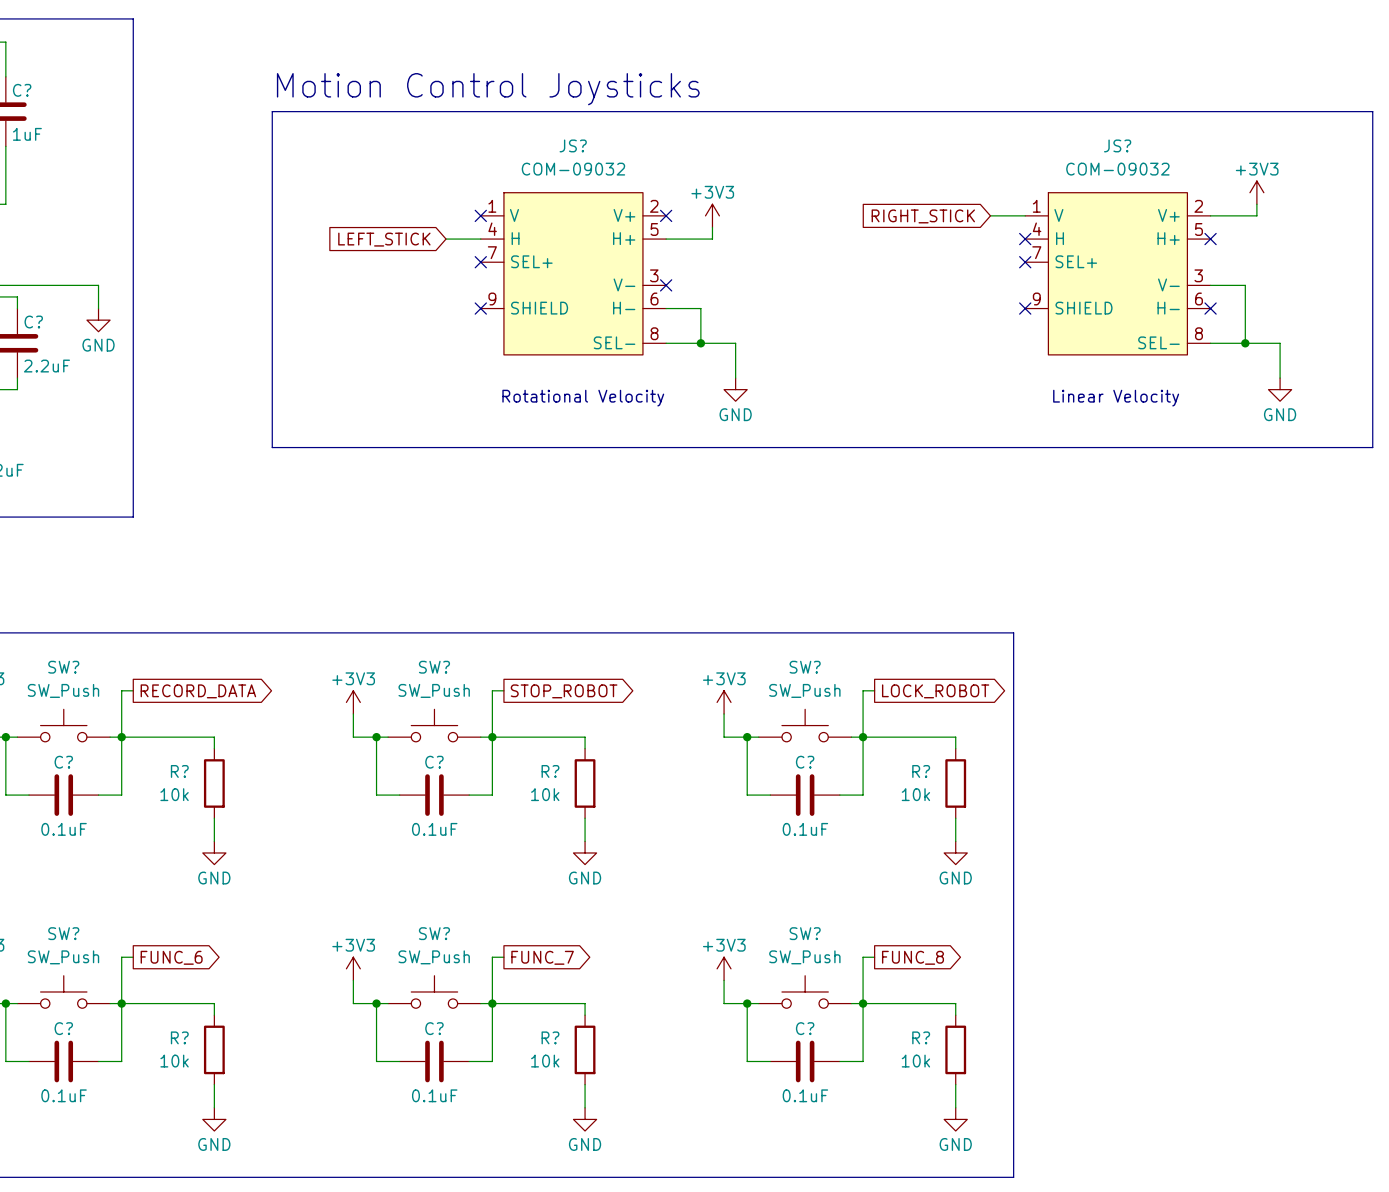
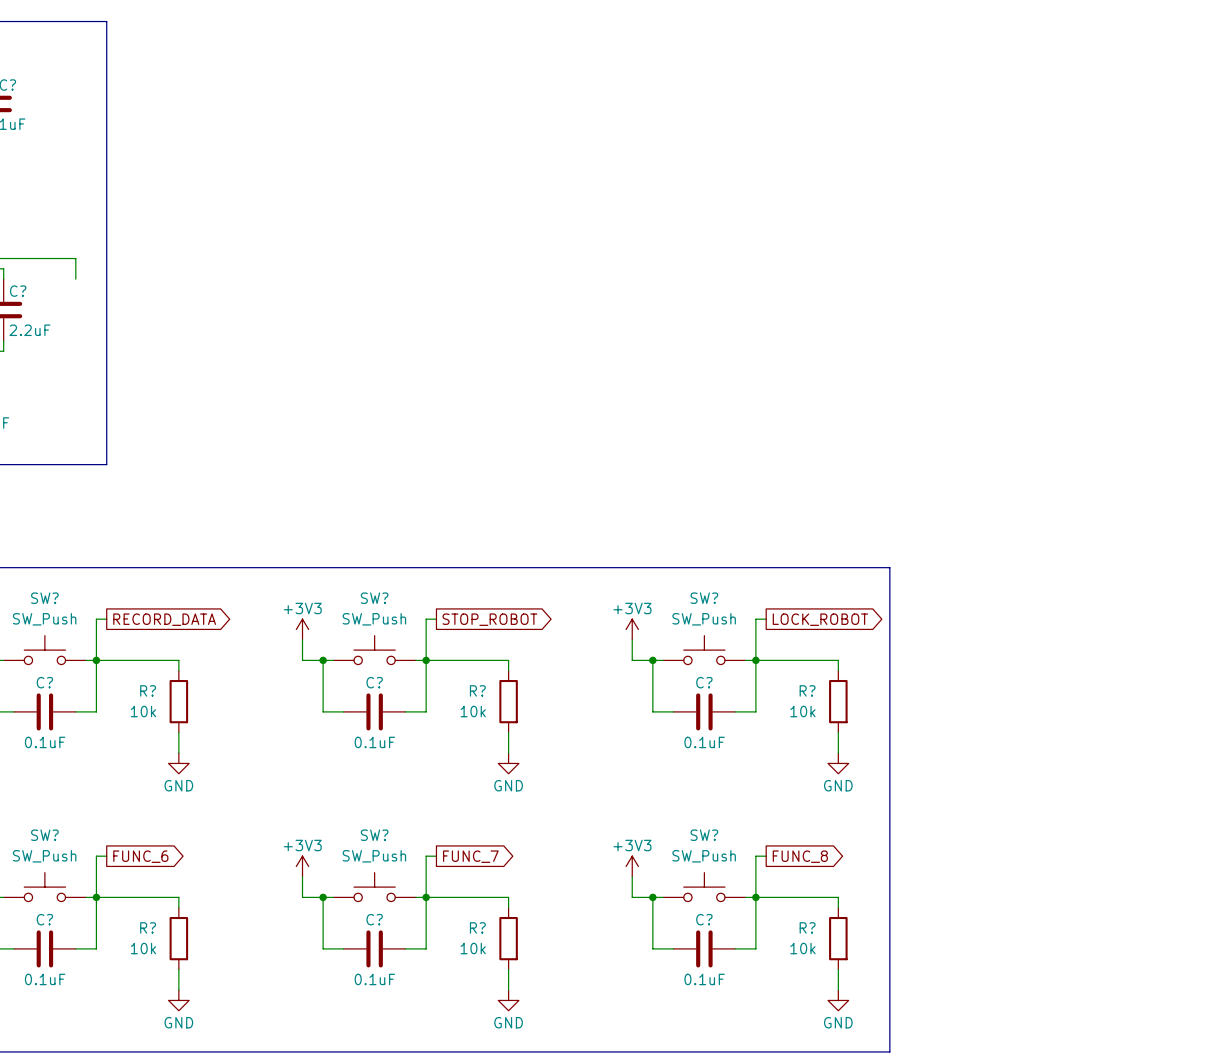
text: Motion Control Joysticks (488, 89) -> none
line: (272, 111) (1372, 111) (1372, 447) (272, 447) (272, 111) -> none
power symbol: +3V3 (1256, 192) -> none
wire: (1256, 204) (1256, 215) (1210, 215) -> none
no-connect mark: (480, 215) -> none
no-connect mark: (666, 215) -> none
power symbol: +3V3 (712, 215) -> none
wire: (990, 215) (1025, 215) -> none
global label: RIGHT_STICK (923, 216) -> none
wire: (712, 227) (712, 239) (666, 239) -> none
global label: LEFT_STICK (384, 239) -> none
wire: (446, 239) (480, 239) -> none
no-connect mark: (1025, 239) -> none
no-connect mark: (1210, 239) -> none
no-connect mark: (480, 262) -> none
no-connect mark: (1025, 262) -> none
JS?: COM-09032 (573, 273) -> none
JS?: COM-09032 (1117, 273) -> none
no-connect mark: (666, 285) -> none
wire: (1210, 285) (1245, 285) (1245, 343) -> none
no-connect mark: (480, 308) -> none
wire: (666, 308) (700, 308) (700, 343) -> none
no-connect mark: (1025, 308) -> none
no-connect mark: (1210, 308) -> none
power symbol: GND (98, 320) -> none
wire: (666, 343) (735, 343) (735, 378) -> none
junction: (700, 343) -> none
wire: (1210, 343) (1280, 343) (1280, 378) -> none
junction: (1245, 343) -> none
power symbol: GND (735, 389) -> none
power symbol: GND (1280, 389) -> none
text: Rotational Velocity (583, 398) -> none
text: Linear Velocity (1116, 398) -> none

